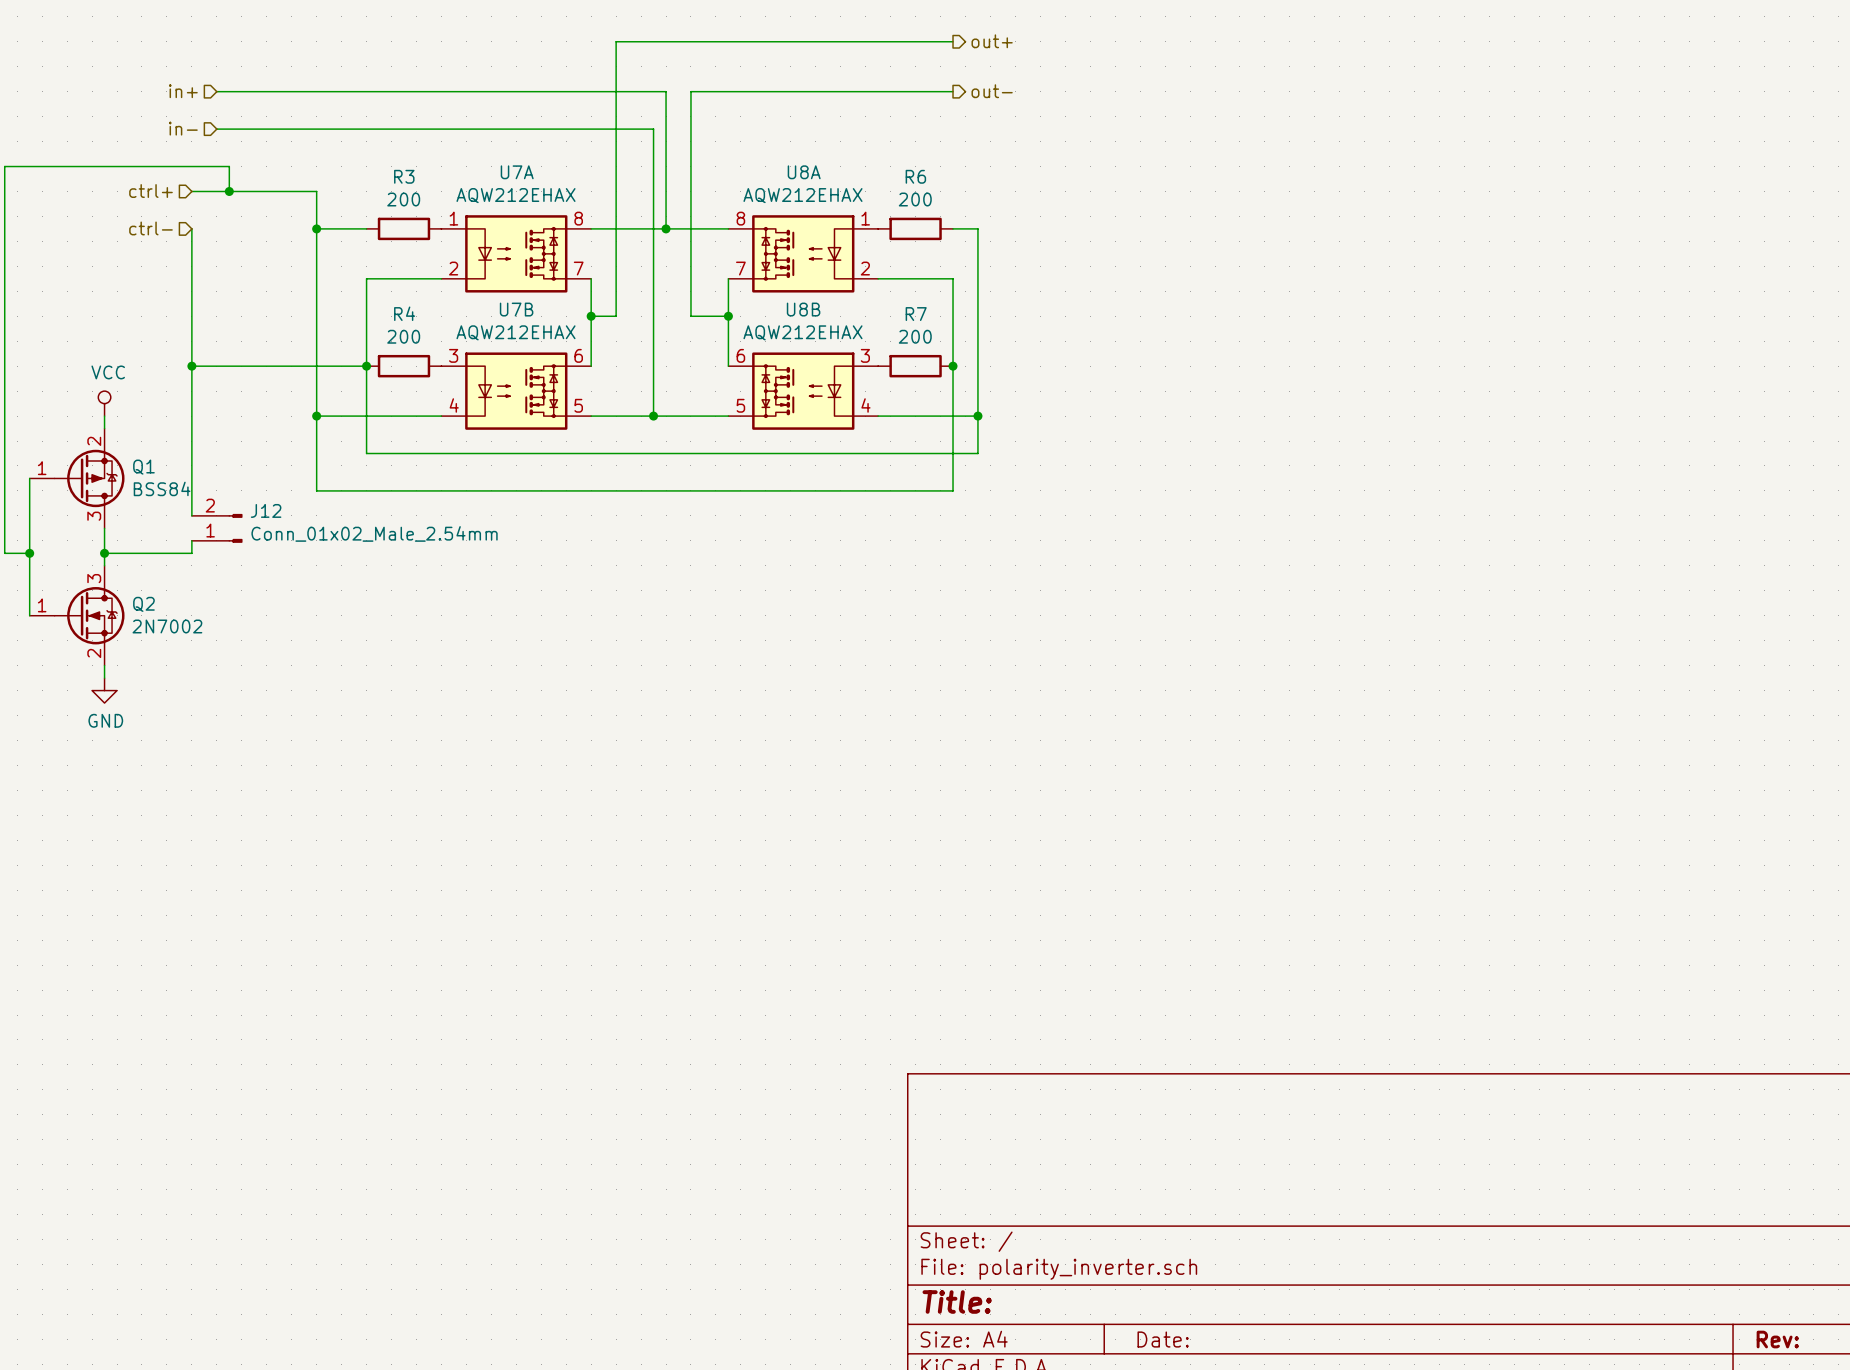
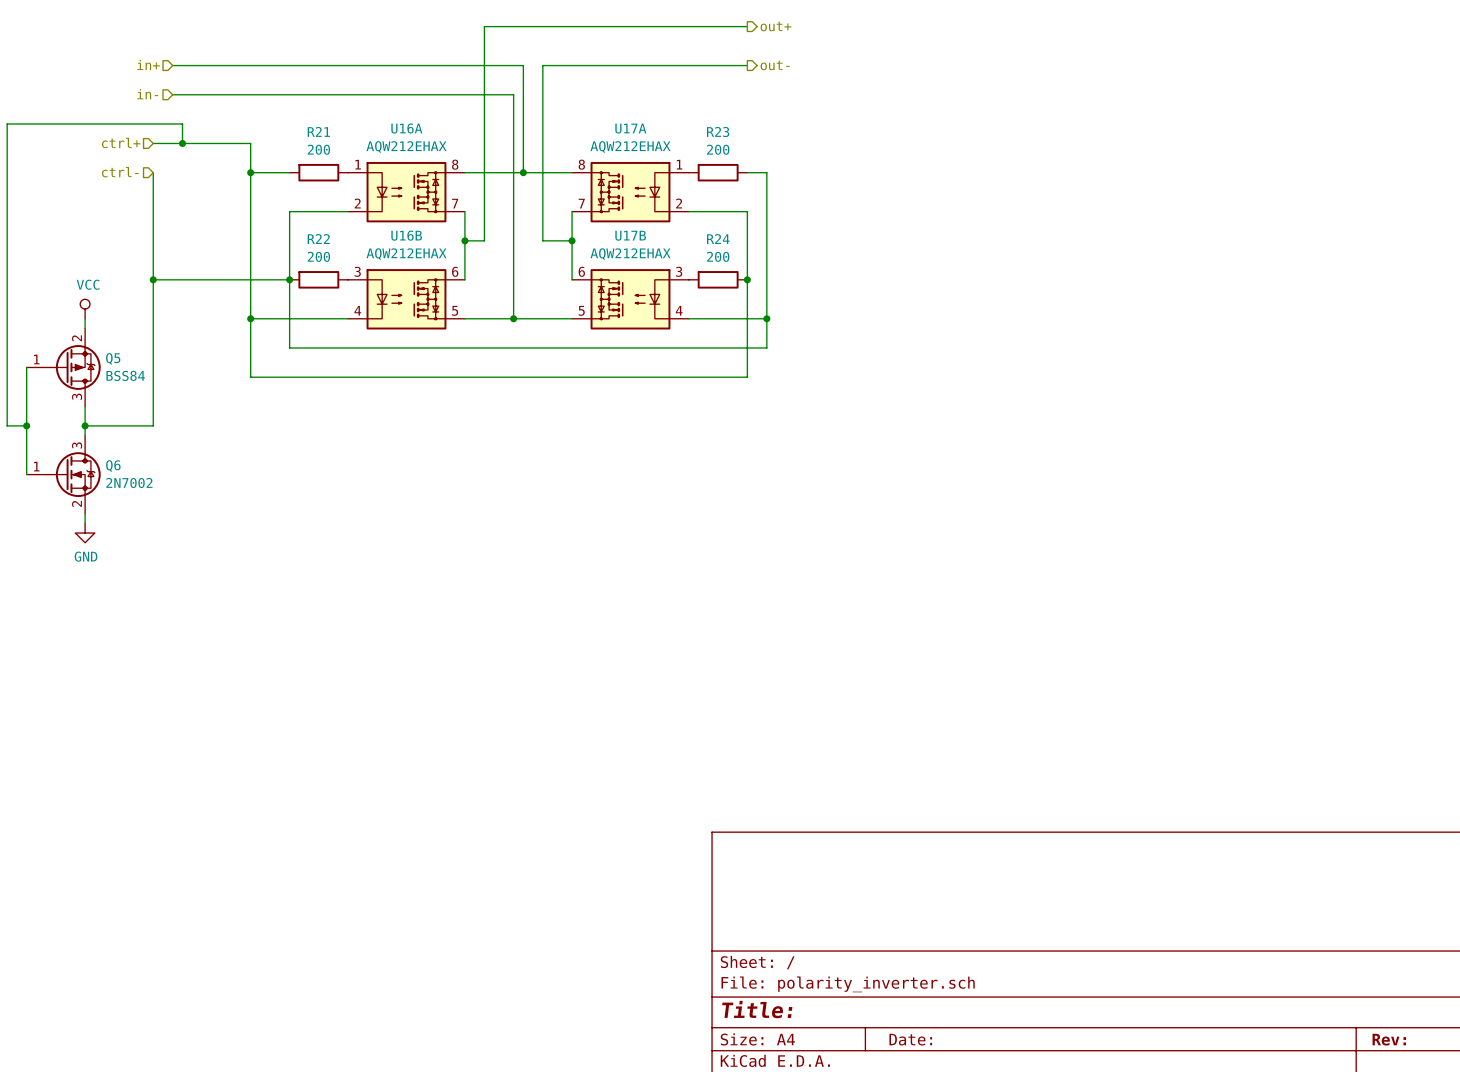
U7A name: U7A (517, 172) -> U16A (406, 128)
U8A name: U8A (804, 172) -> U17A (630, 128)
R3 name: R3 (404, 176) -> R21 (318, 131)
R6 name: R6 (915, 176) -> R23 (718, 132)
U7B name: U7B (516, 309) -> U16B (406, 235)
U8B name: U8B (803, 309) -> U17B (630, 235)
R4 name: R4 (404, 313) -> R22 (318, 239)
R7 name: R7 (916, 314) -> R24 (718, 239)
Q1 name: Q1 (143, 467) -> Q5 (113, 358)
wire: none -> (153, 396) (153, 416)
J12: Conn_01x02_Male_2.54mm (217, 528) -> none
Q2 name: Q2 (143, 604) -> Q6 (113, 466)

